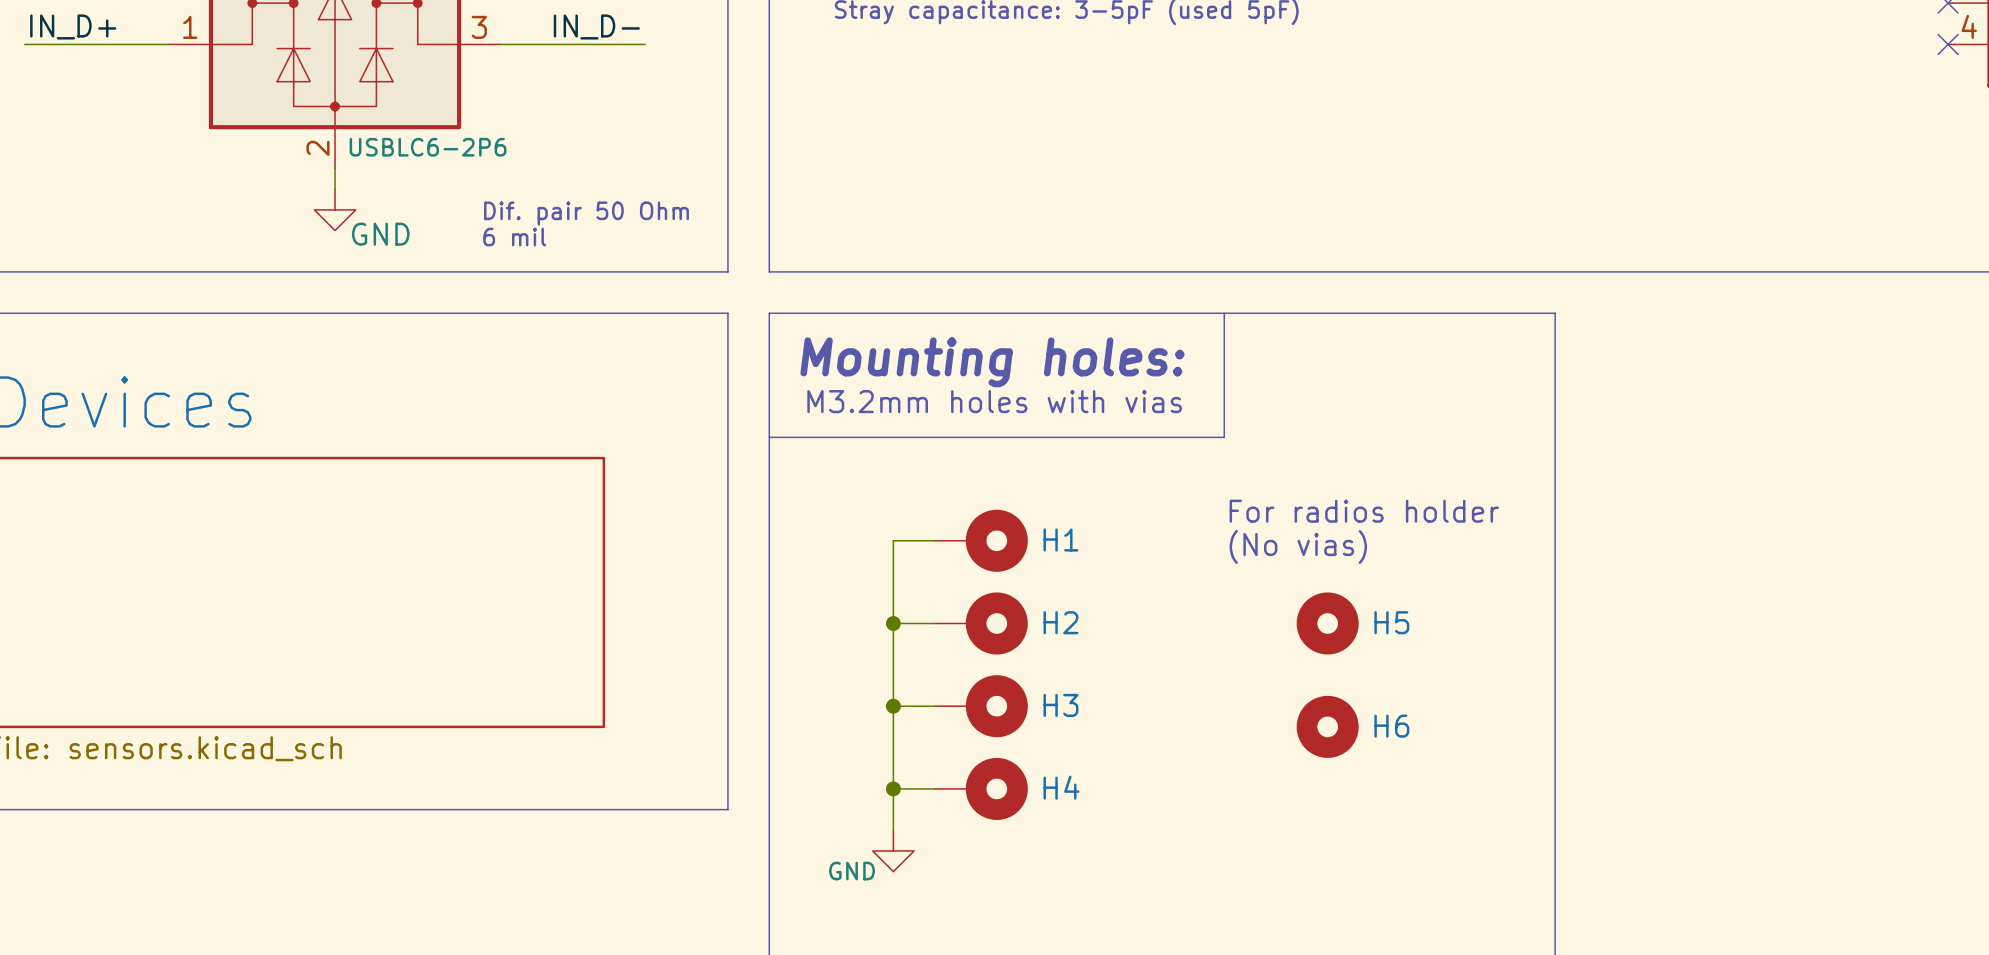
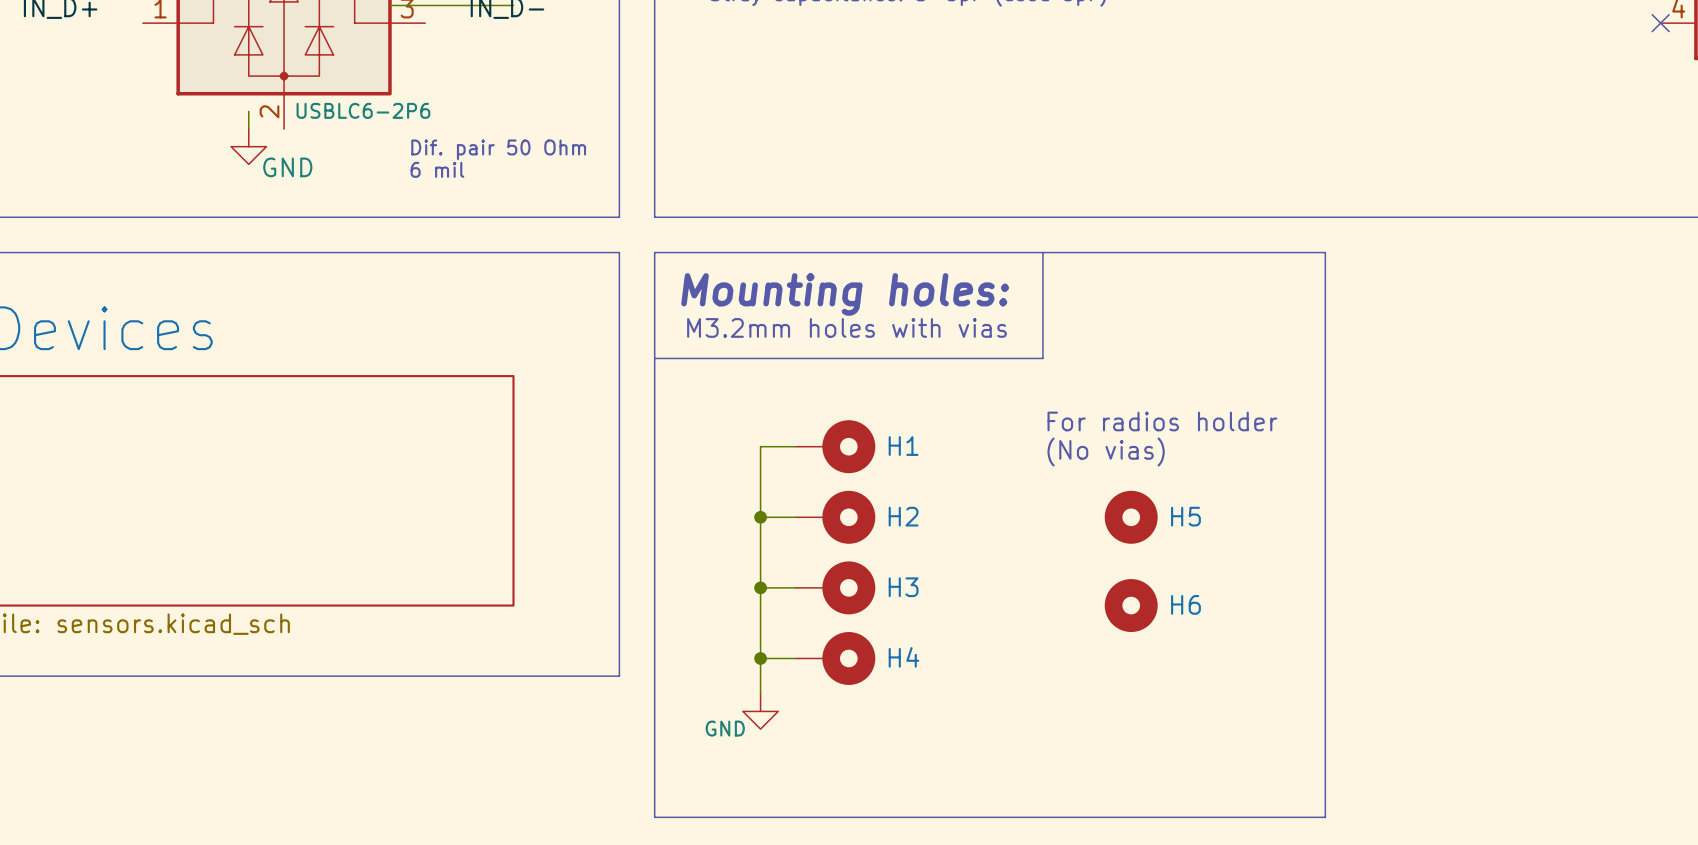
wire: (24, 44) (169, 44) -> none
wire: (500, 44) (645, 44) -> (389, 5) (513, 5)
wire: (335, 168) (335, 189) -> (248, 111) (248, 129)
power symbol position: GND (335, 209) -> GND (248, 146)
text position: Dif. pair 50 Ohm (586, 213) -> Dif. pair 50 Ohm (498, 149)
text position: 6 mil (514, 237) -> 6 mil (437, 169)

